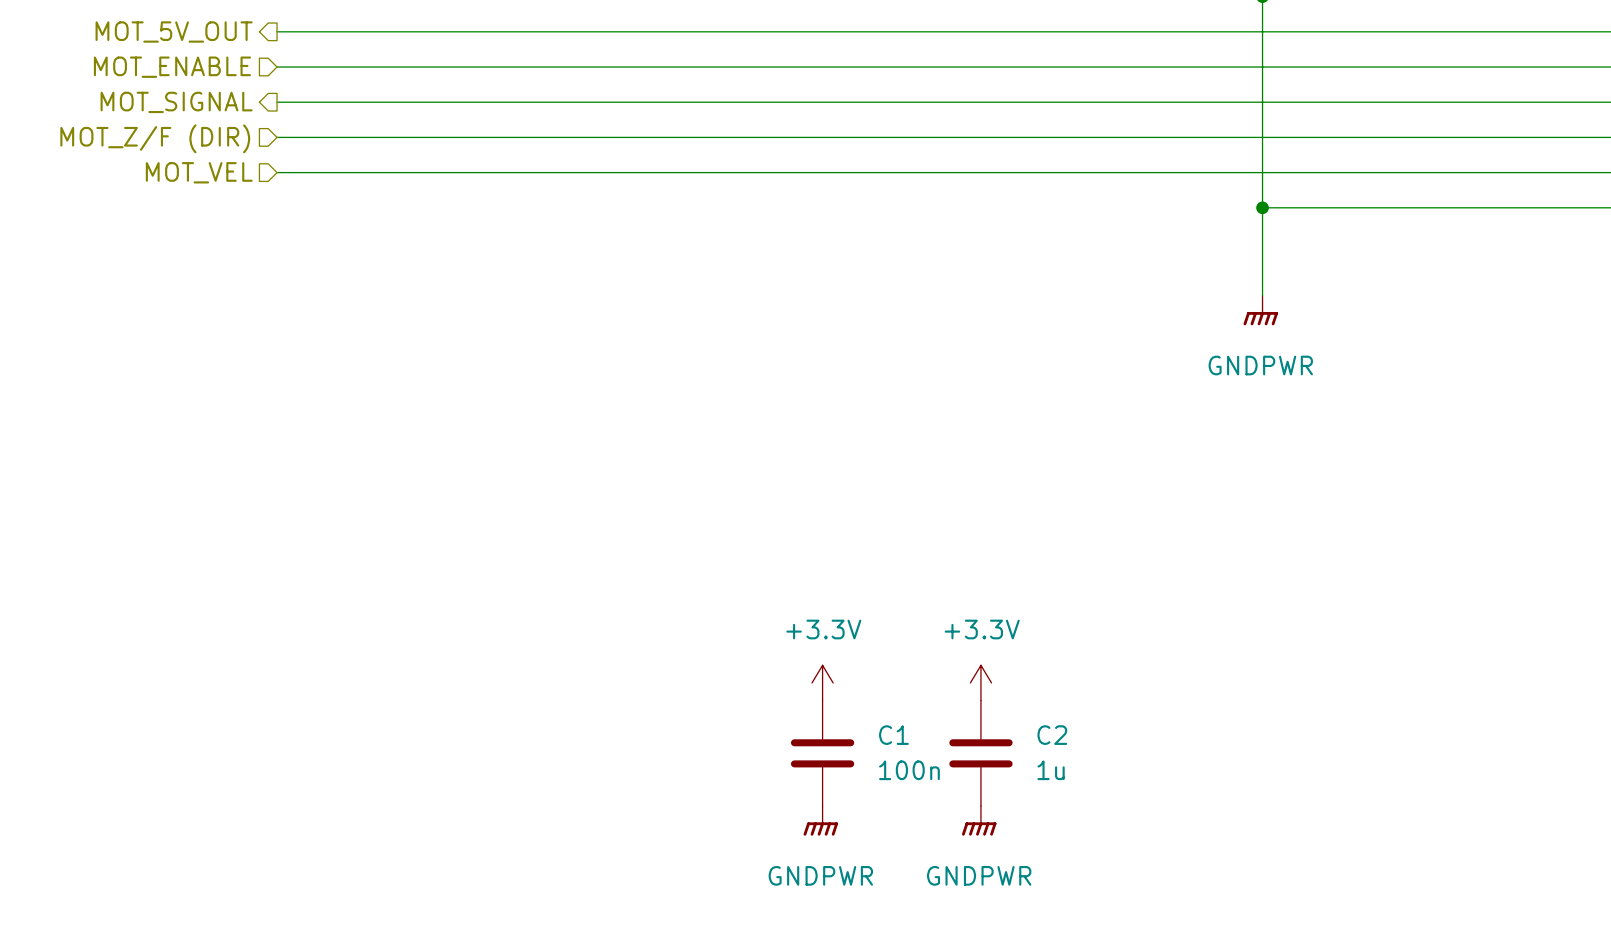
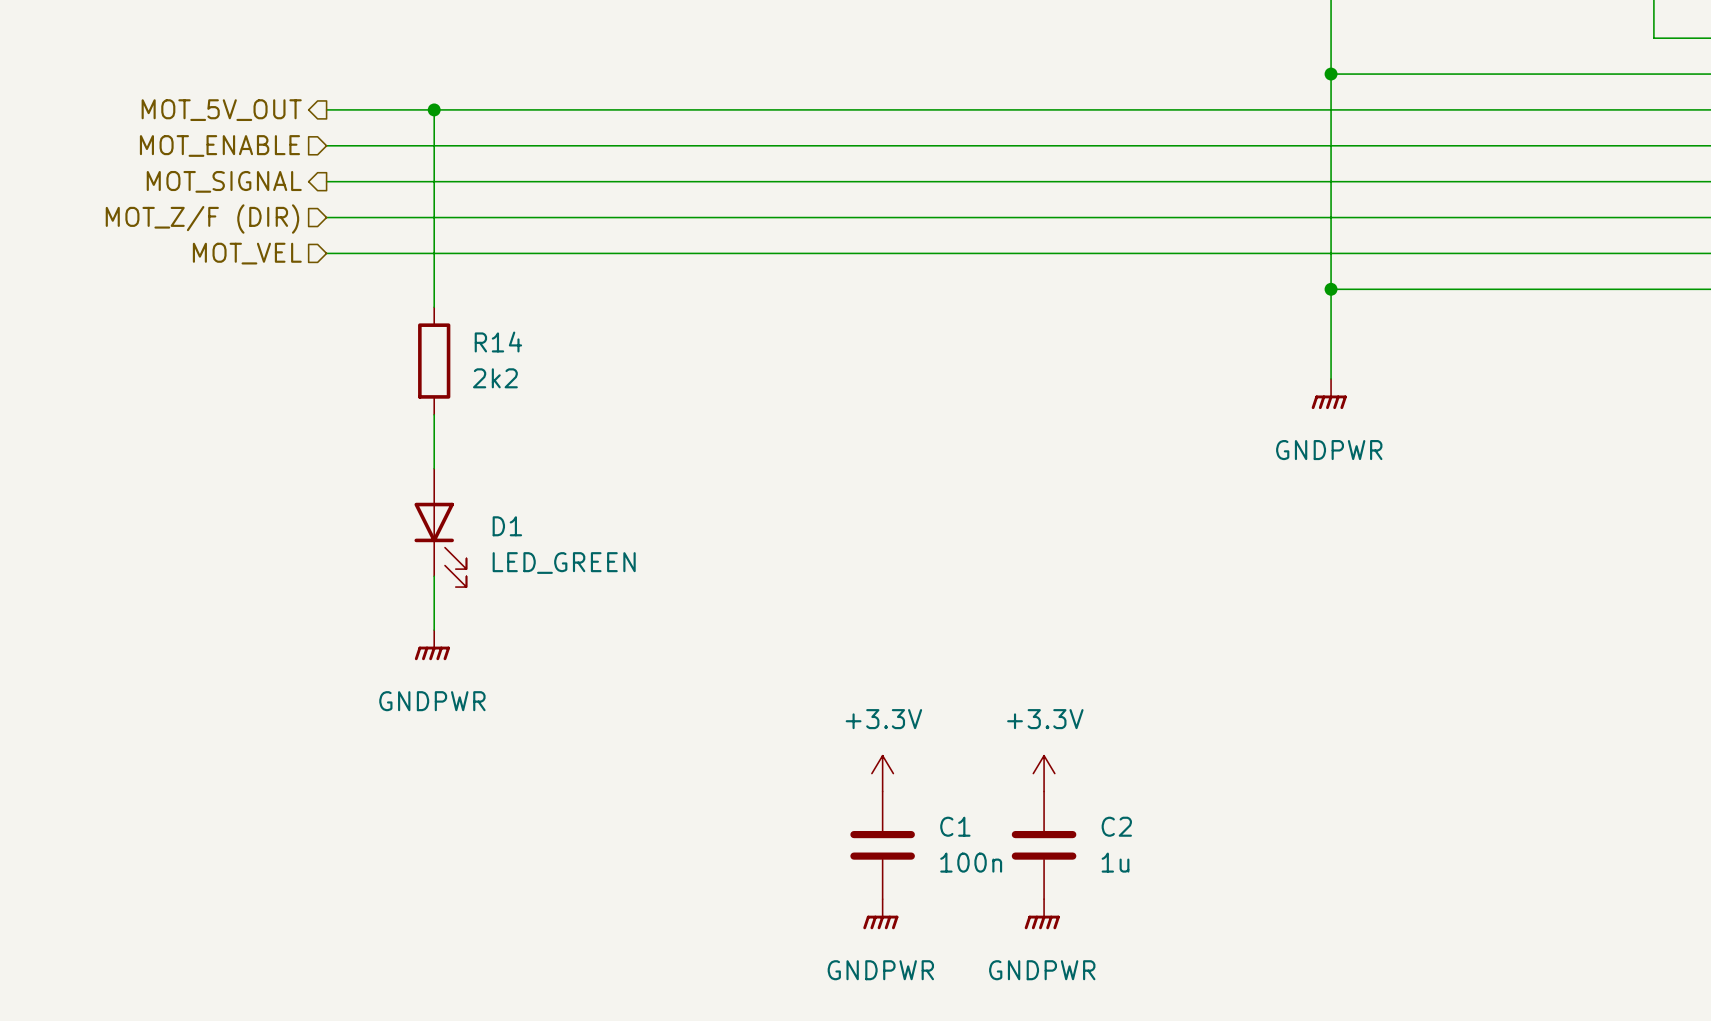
wire: none -> (434, 109) (434, 307)
junction: none -> (434, 109)
R14: none -> 2k2 (434, 361)
wire: none -> (434, 414) (434, 468)
D1: none -> LED_GREEN (440, 527)
wire: none -> (434, 576) (434, 630)
power symbol: none -> GNDPWR (432, 645)

